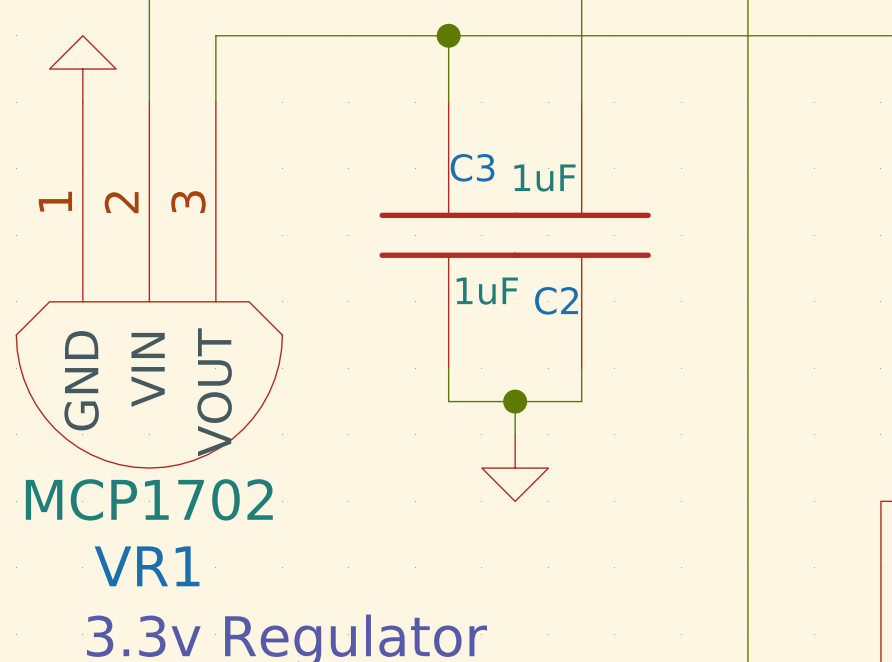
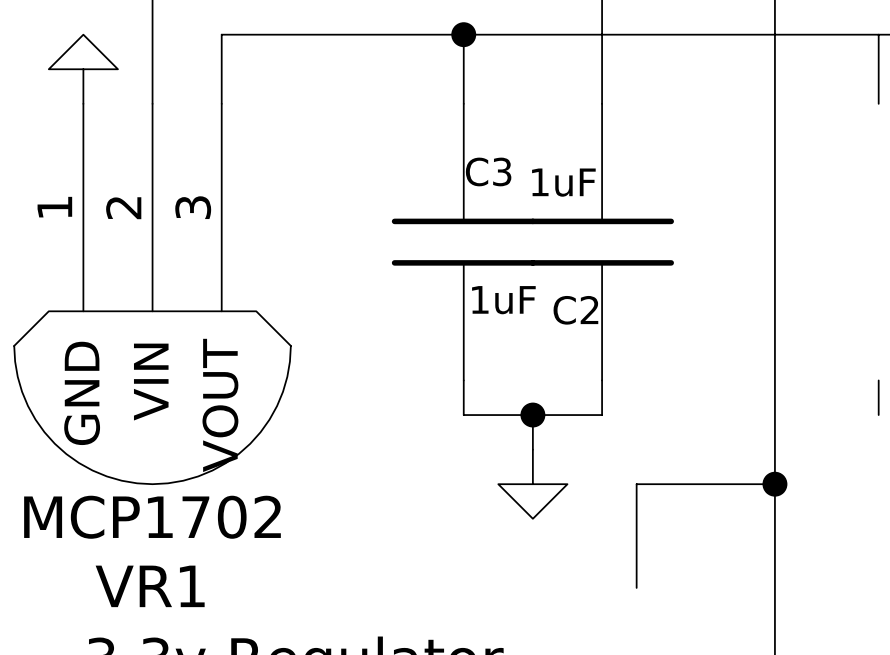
wire: none -> (878, 34) (878, 103)
wire: none -> (878, 380) (878, 415)
wire: none -> (774, 484) (636, 484) (636, 587)
junction: none -> (774, 484)

